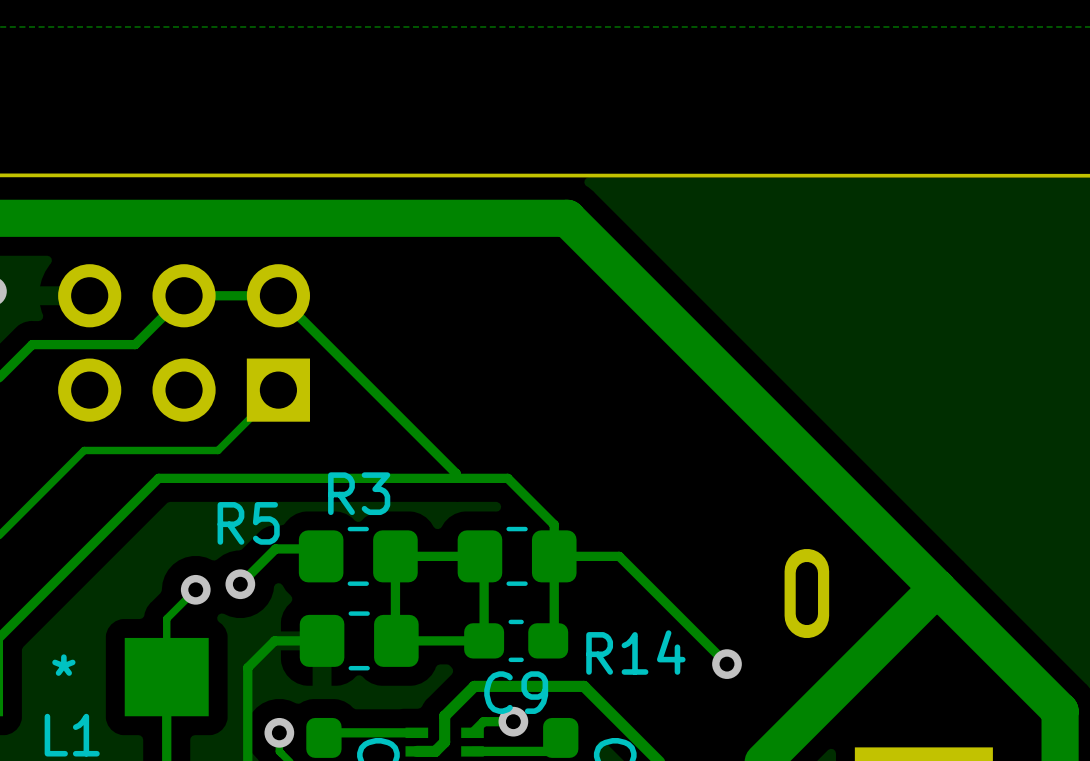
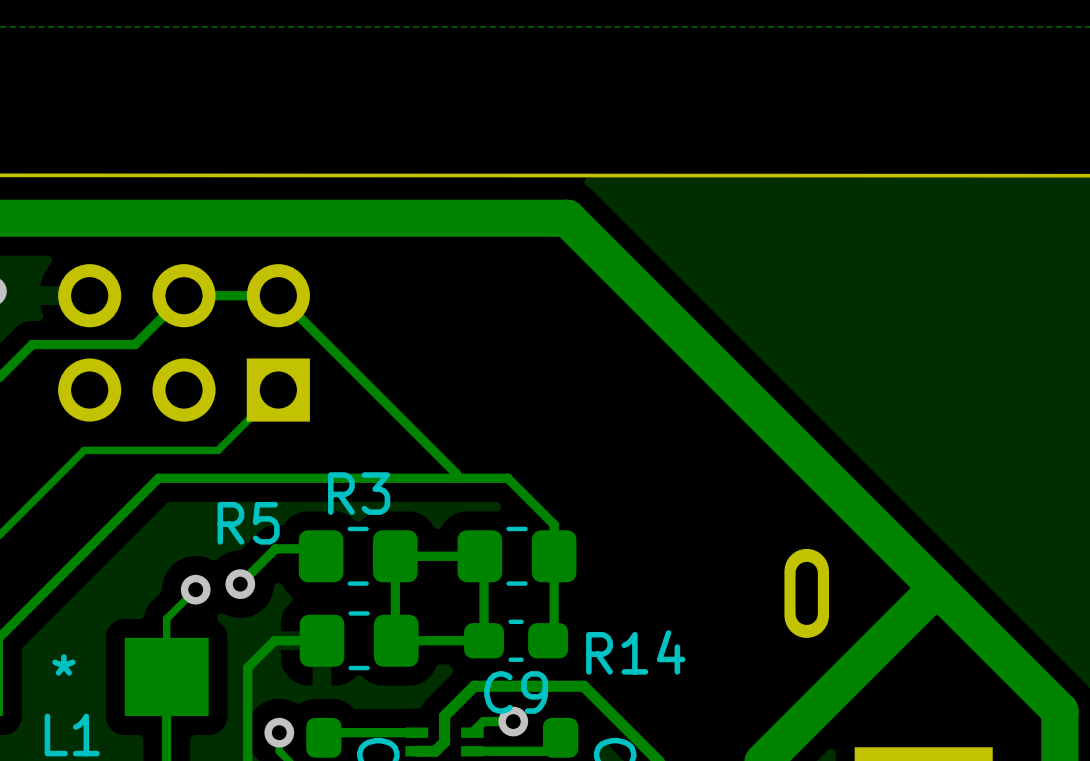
track: (554, 556) (619, 556) (726, 664) -> none
via: (726, 664) -> none

